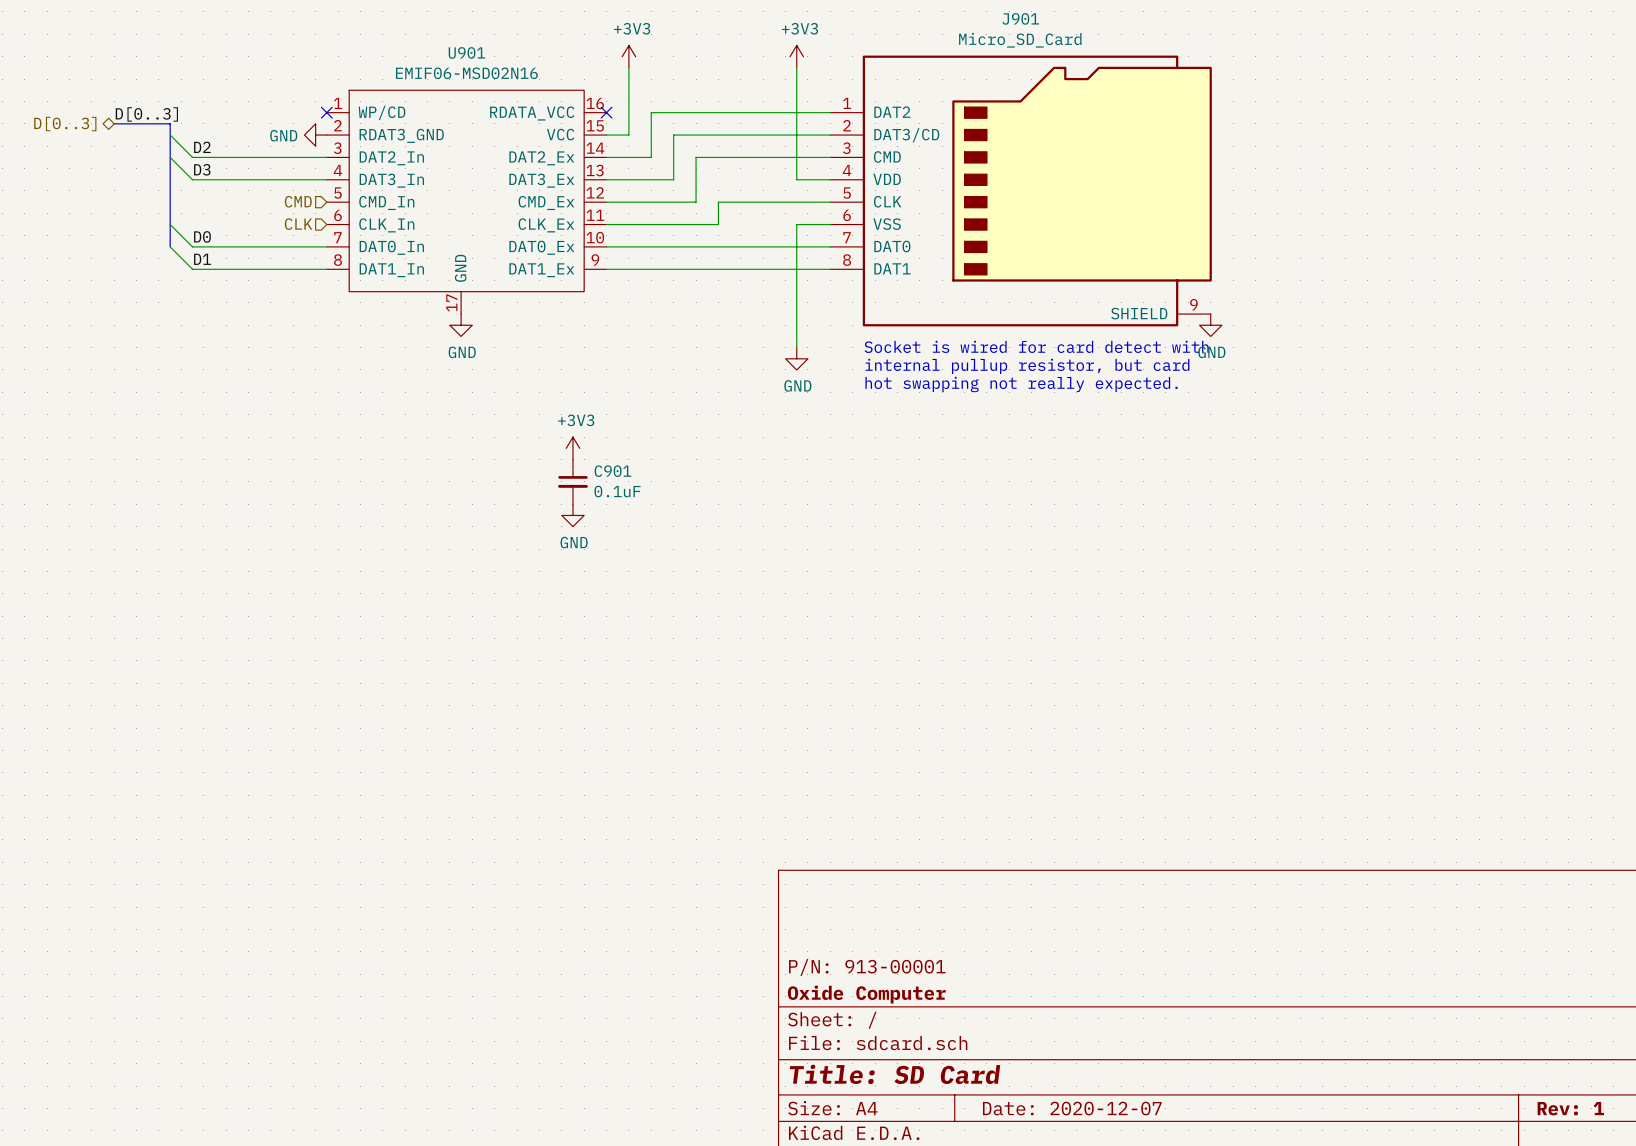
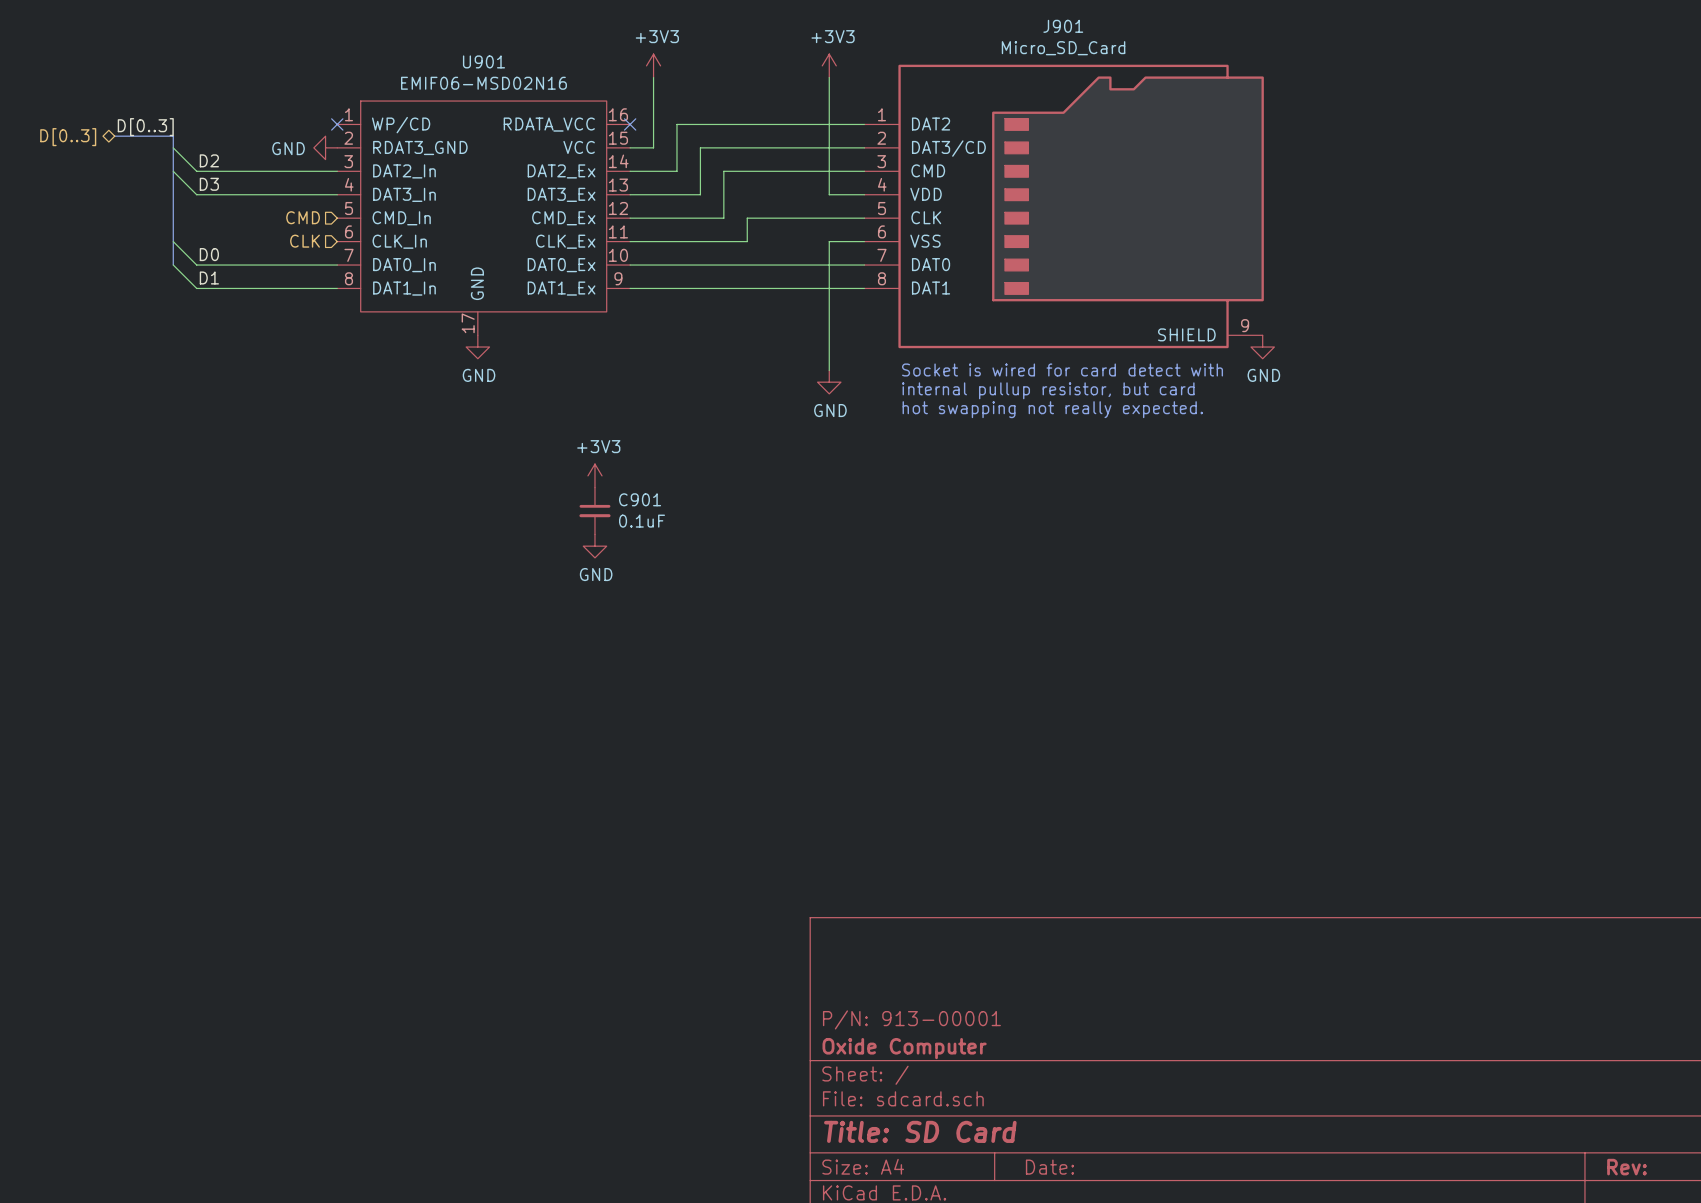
title block: Date: 2020-12-07 (1072, 1108) -> Date: (1049, 1167)
title block: Rev: 1 (1570, 1108) -> Rev: (1626, 1167)

